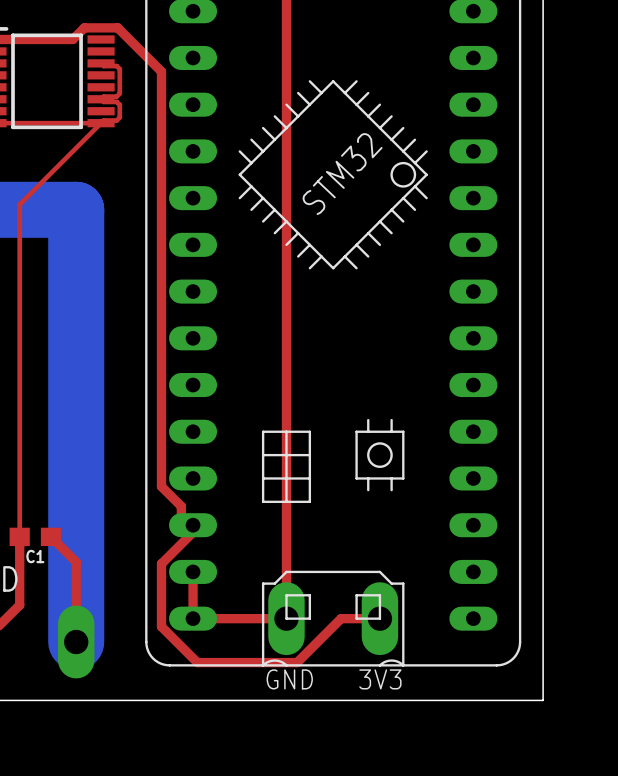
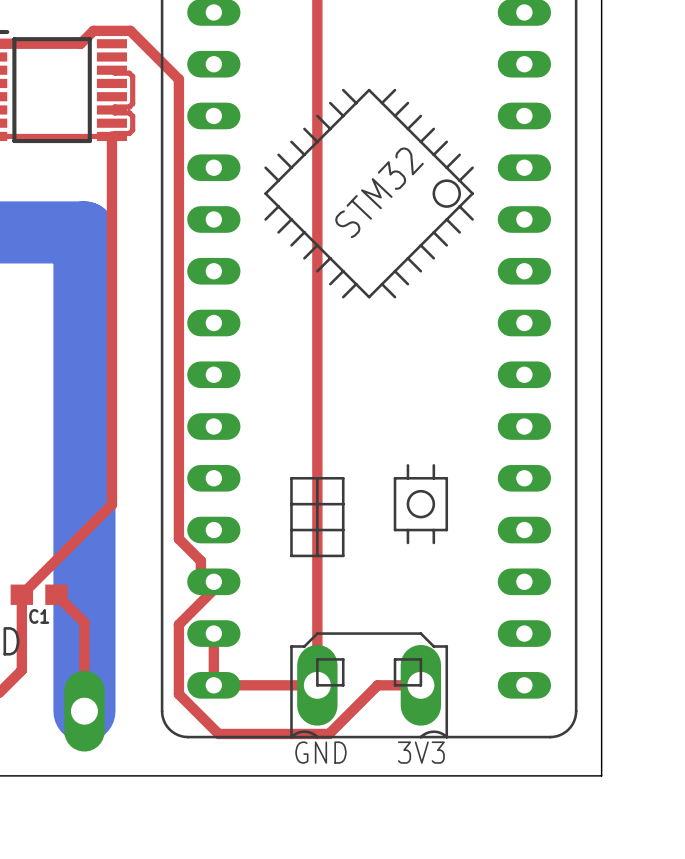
top track: (101, 123) (19, 204) (19, 536) -> (111, 136) (111, 504) (21, 594)

